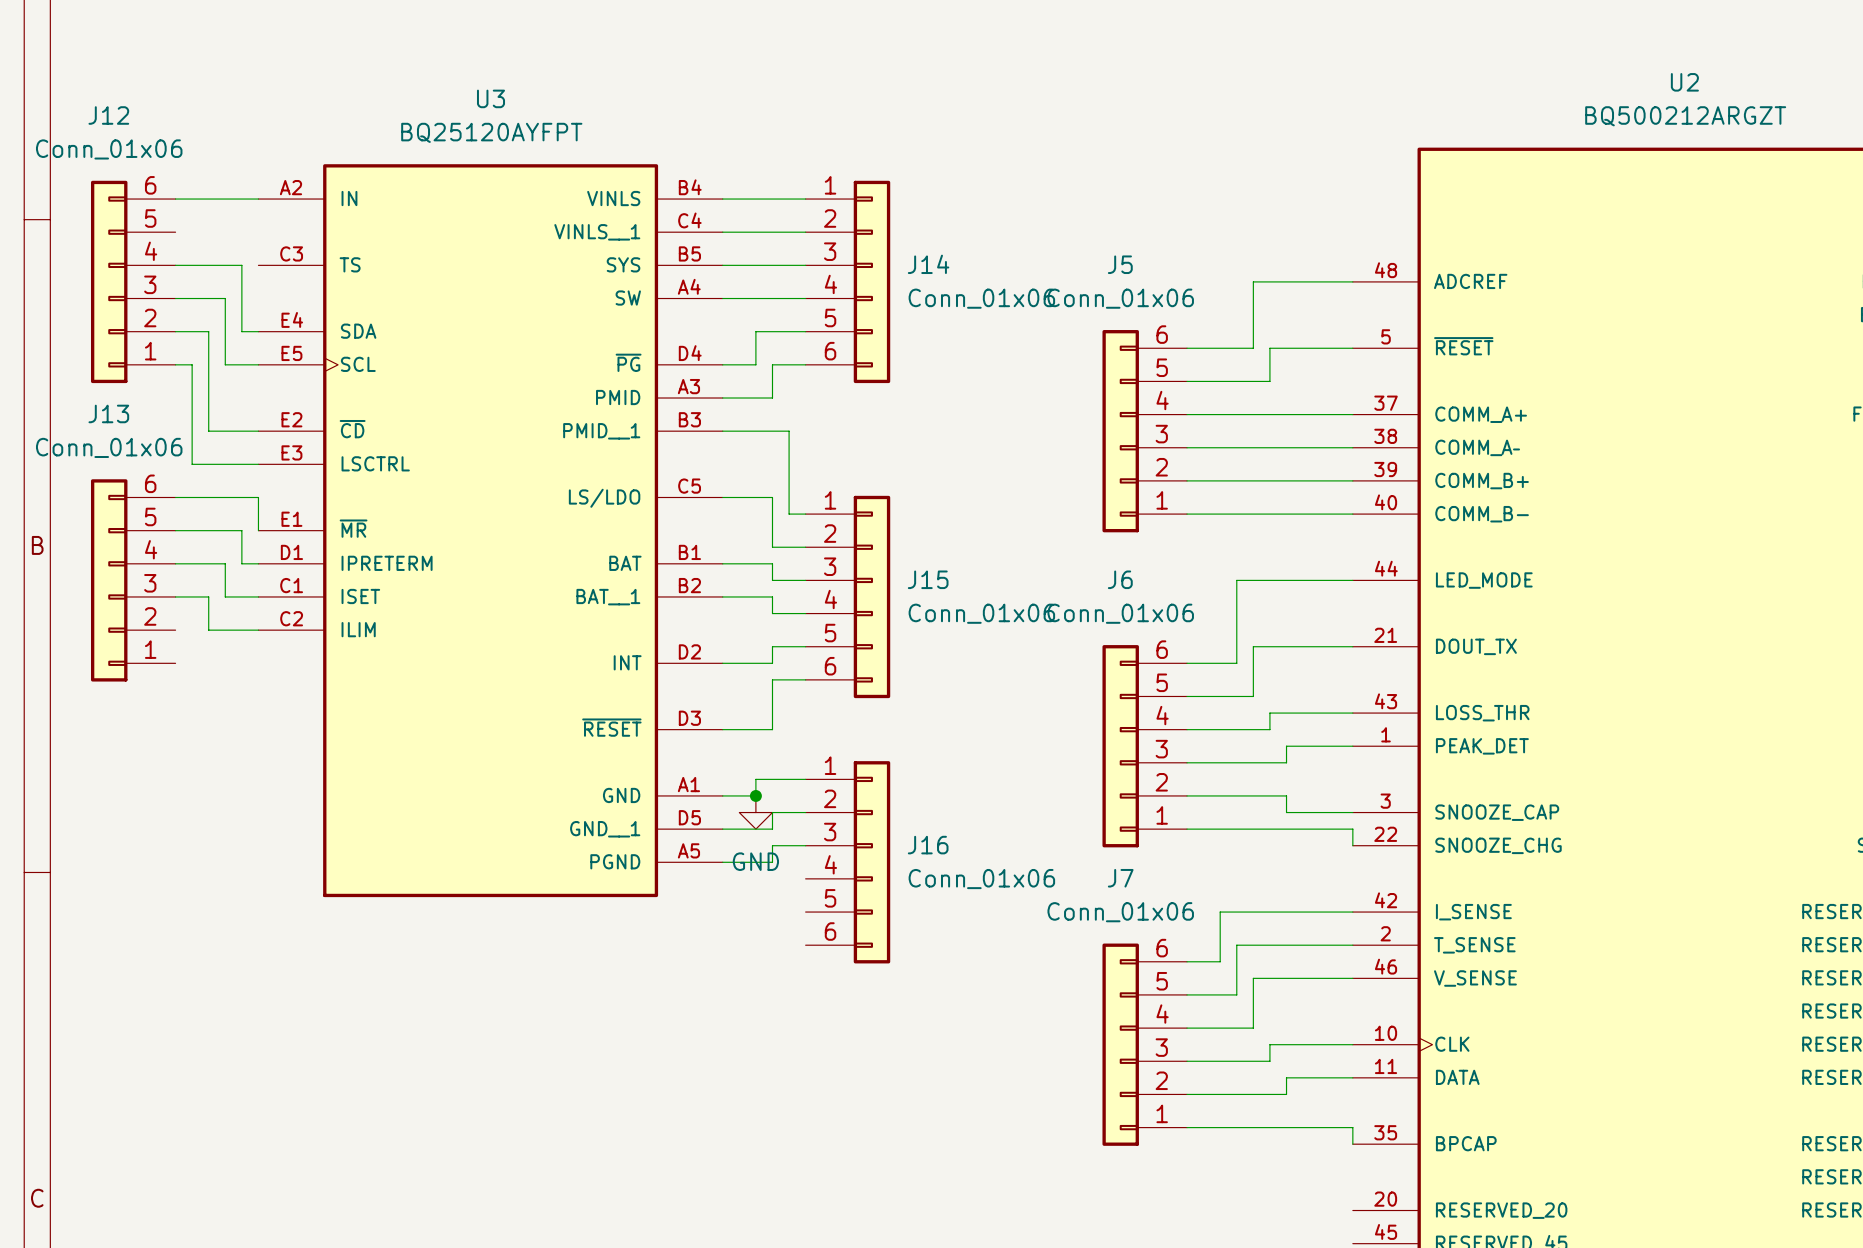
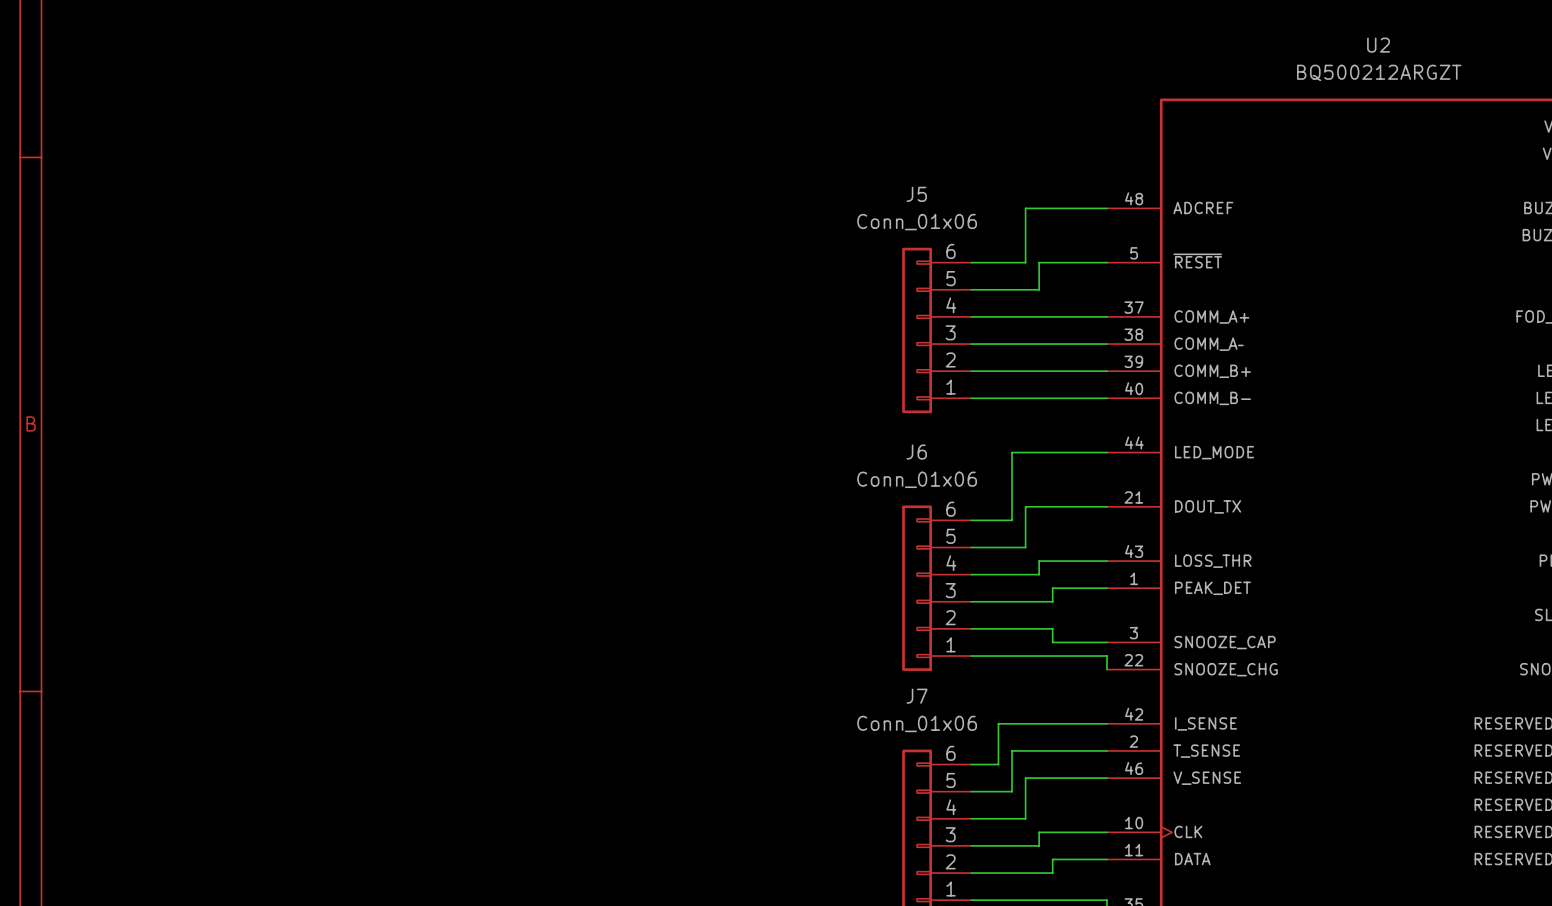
wire: (175, 199) (258, 199) -> none
wire: (722, 199) (805, 199) -> none
wire: (722, 232) (805, 232) -> none
wire: (175, 265) (241, 265) (241, 331) (258, 331) -> none
wire: (722, 265) (805, 265) -> none
J12: Conn_01x06 (133, 281) -> none
J14: Conn_01x06 (847, 281) -> none
wire: (175, 298) (225, 298) (225, 364) (258, 364) -> none
wire: (722, 298) (805, 298) -> none
wire: (175, 331) (208, 331) (208, 431) (258, 431) -> none
wire: (805, 331) (755, 331) (755, 364) (722, 364) -> none
wire: (175, 364) (192, 364) (192, 464) (258, 464) -> none
wire: (805, 364) (772, 364) (772, 398) (722, 398) -> none
wire: (722, 431) (789, 431) (789, 514) (805, 514) -> none
wire: (175, 497) (258, 497) (258, 530) -> none
wire: (722, 497) (772, 497) (772, 547) (805, 547) -> none
wire: (175, 530) (241, 530) (241, 563) (258, 563) -> none
U3: BQ25120AYFPT (490, 530) -> none
wire: (175, 563) (225, 563) (225, 596) (258, 596) -> none
wire: (722, 563) (772, 563) (772, 580) (805, 580) -> none
J13: Conn_01x06 (133, 580) -> none
wire: (175, 596) (208, 596) (208, 630) (258, 630) -> none
wire: (722, 596) (772, 596) (772, 613) (805, 613) -> none
J15: Conn_01x06 (847, 596) -> none
wire: (805, 646) (772, 646) (772, 663) (722, 663) -> none
wire: (805, 679) (772, 679) (772, 729) (722, 729) -> none
wire: (805, 779) (755, 779) (755, 795) (722, 795) -> none
junction: (755, 795) -> none
power symbol: GND (755, 812) -> none
wire: (805, 812) (772, 812) (772, 829) (722, 829) -> none
wire: (805, 845) (772, 845) (772, 862) (722, 862) -> none
J16: Conn_01x06 (847, 862) -> none

